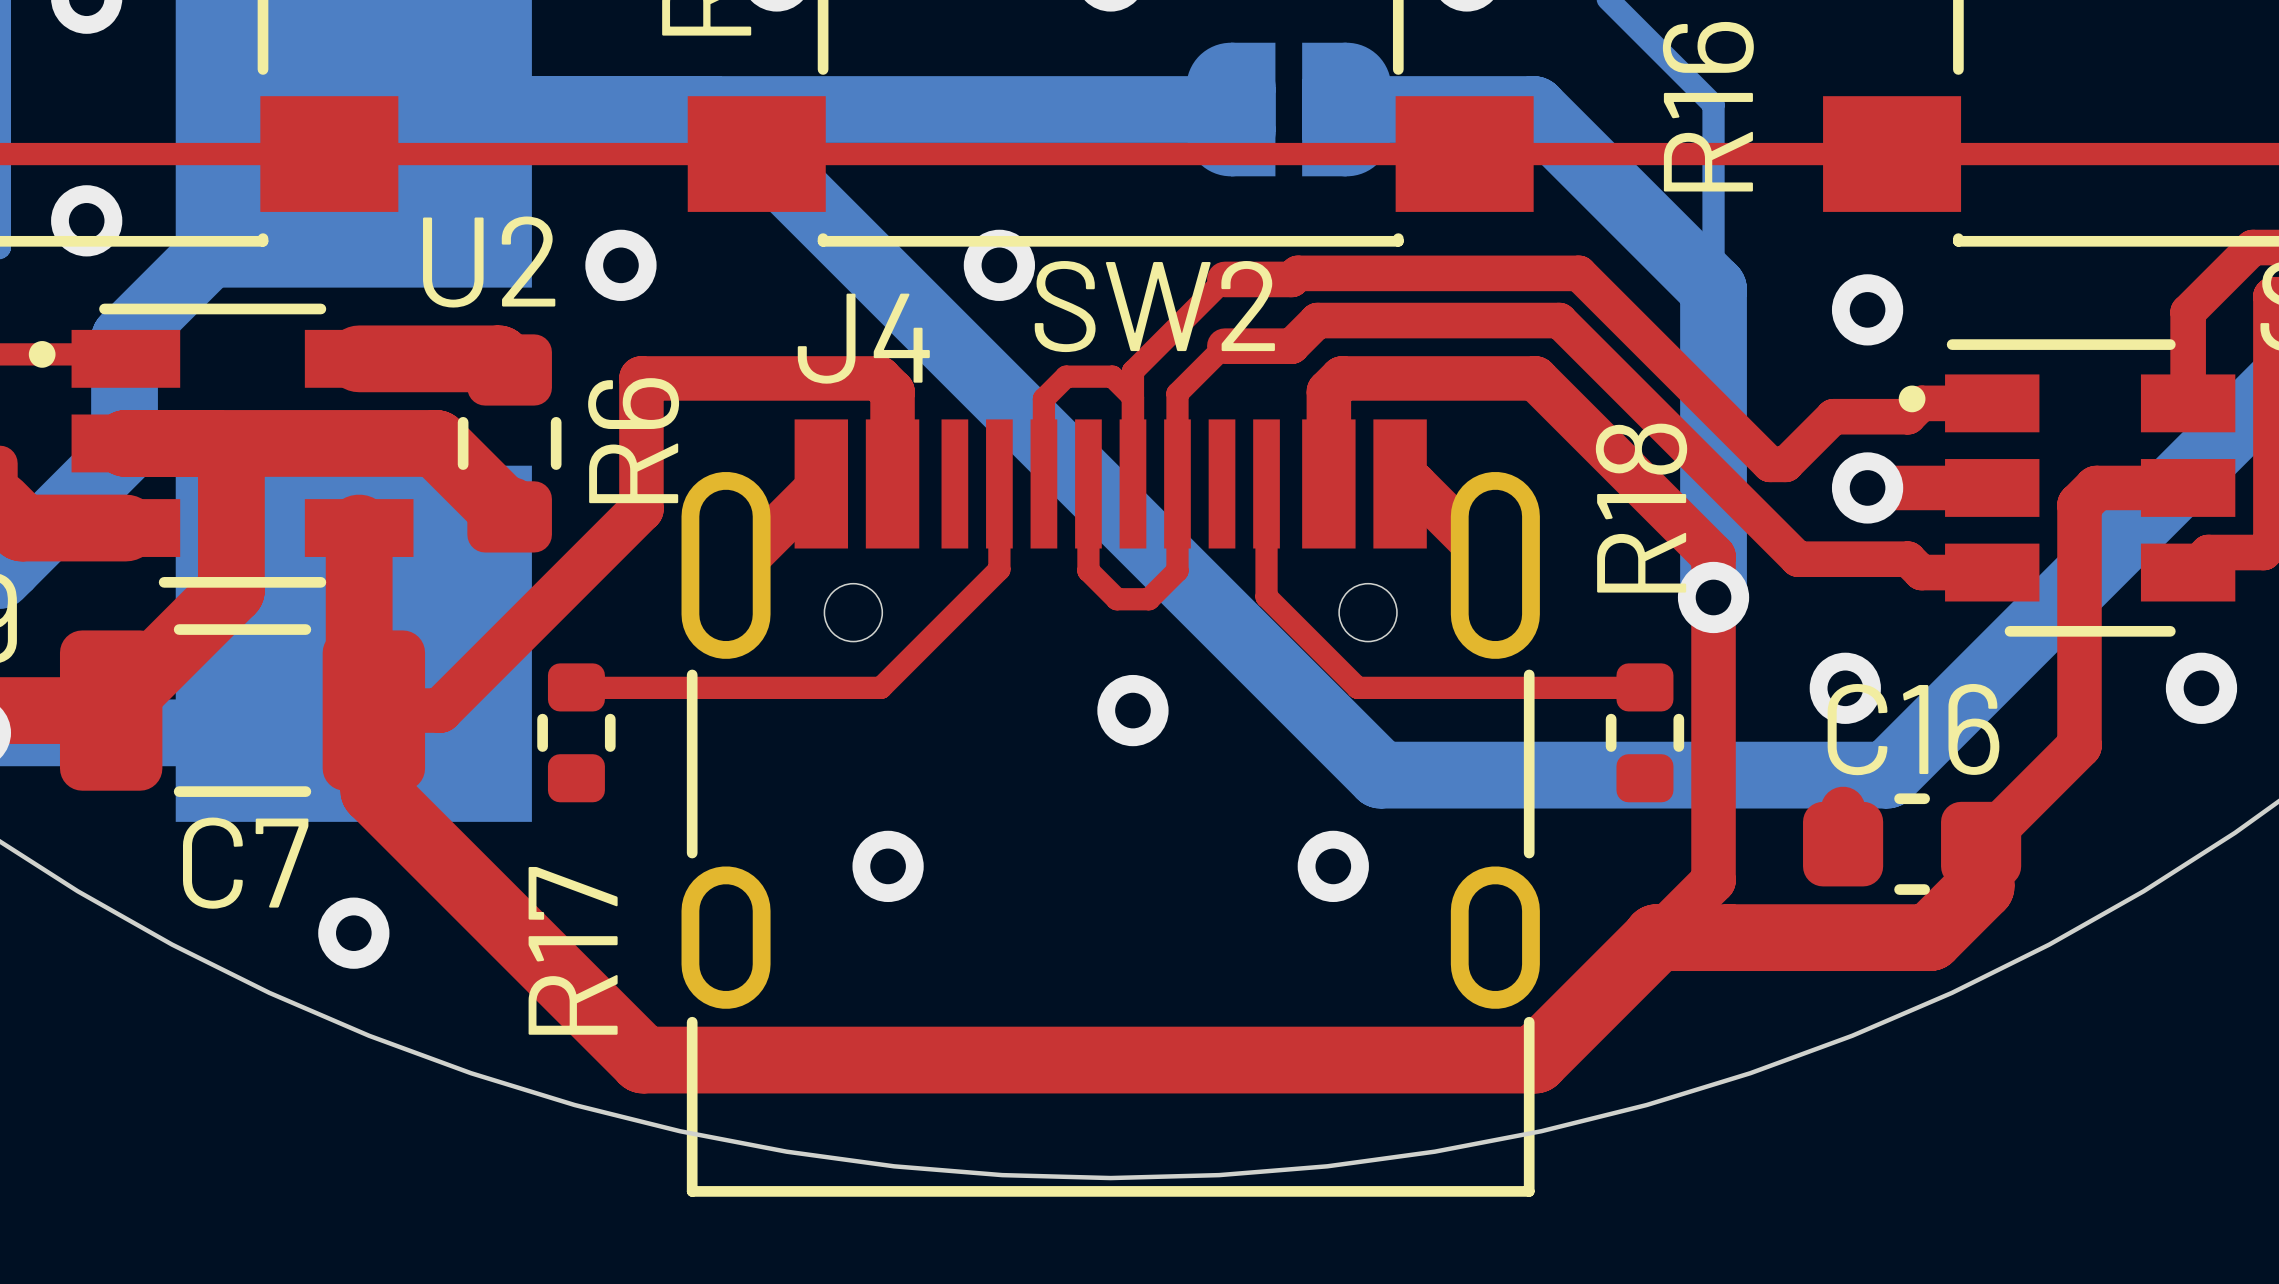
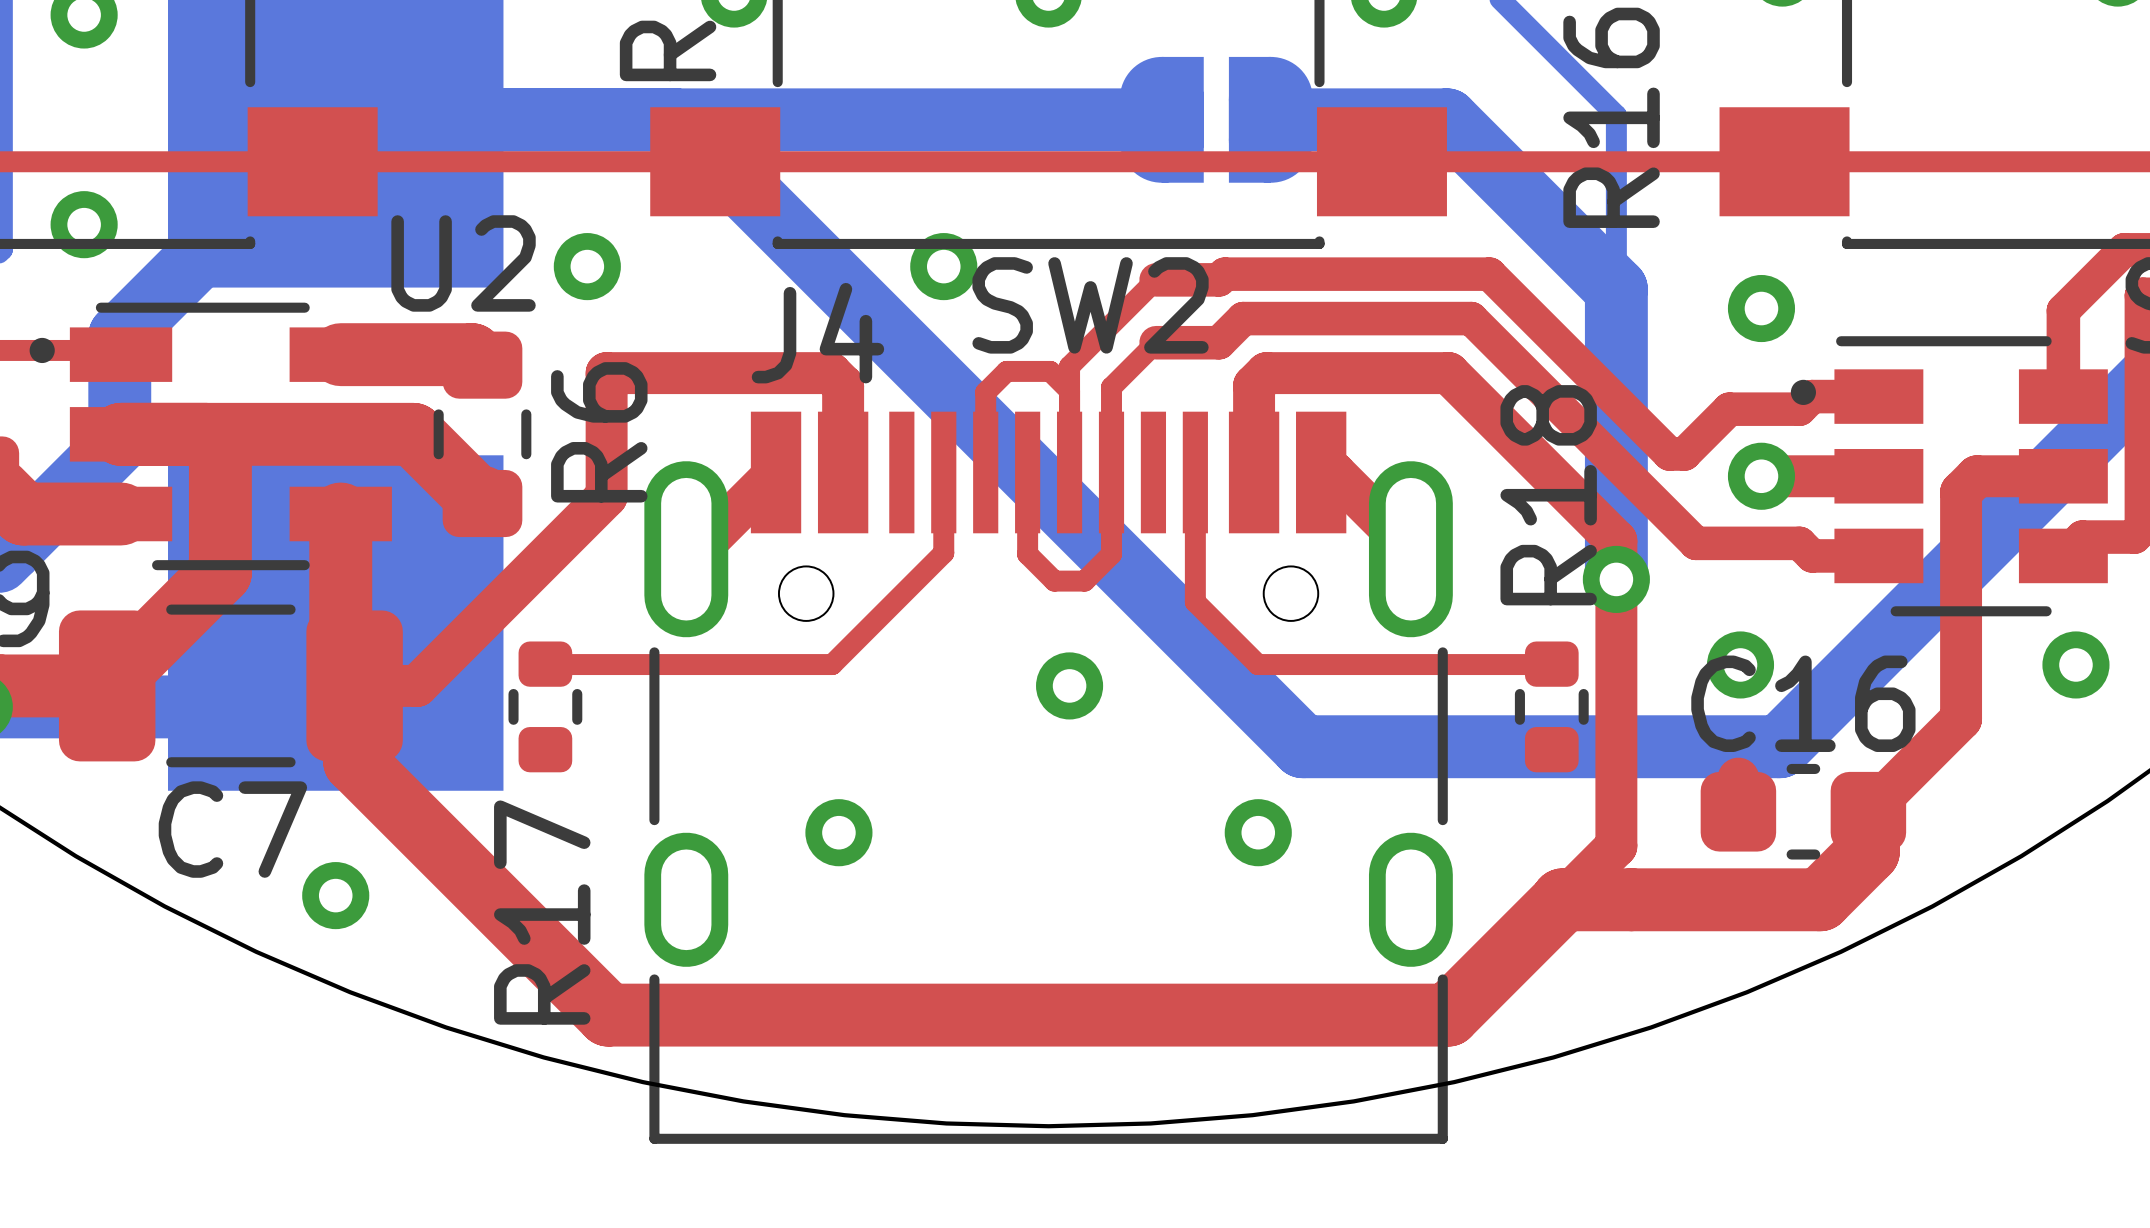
top track: (1266, 596) (1357, 687) -> (1195, 578) (1195, 602) (1257, 664) (1281, 664)

